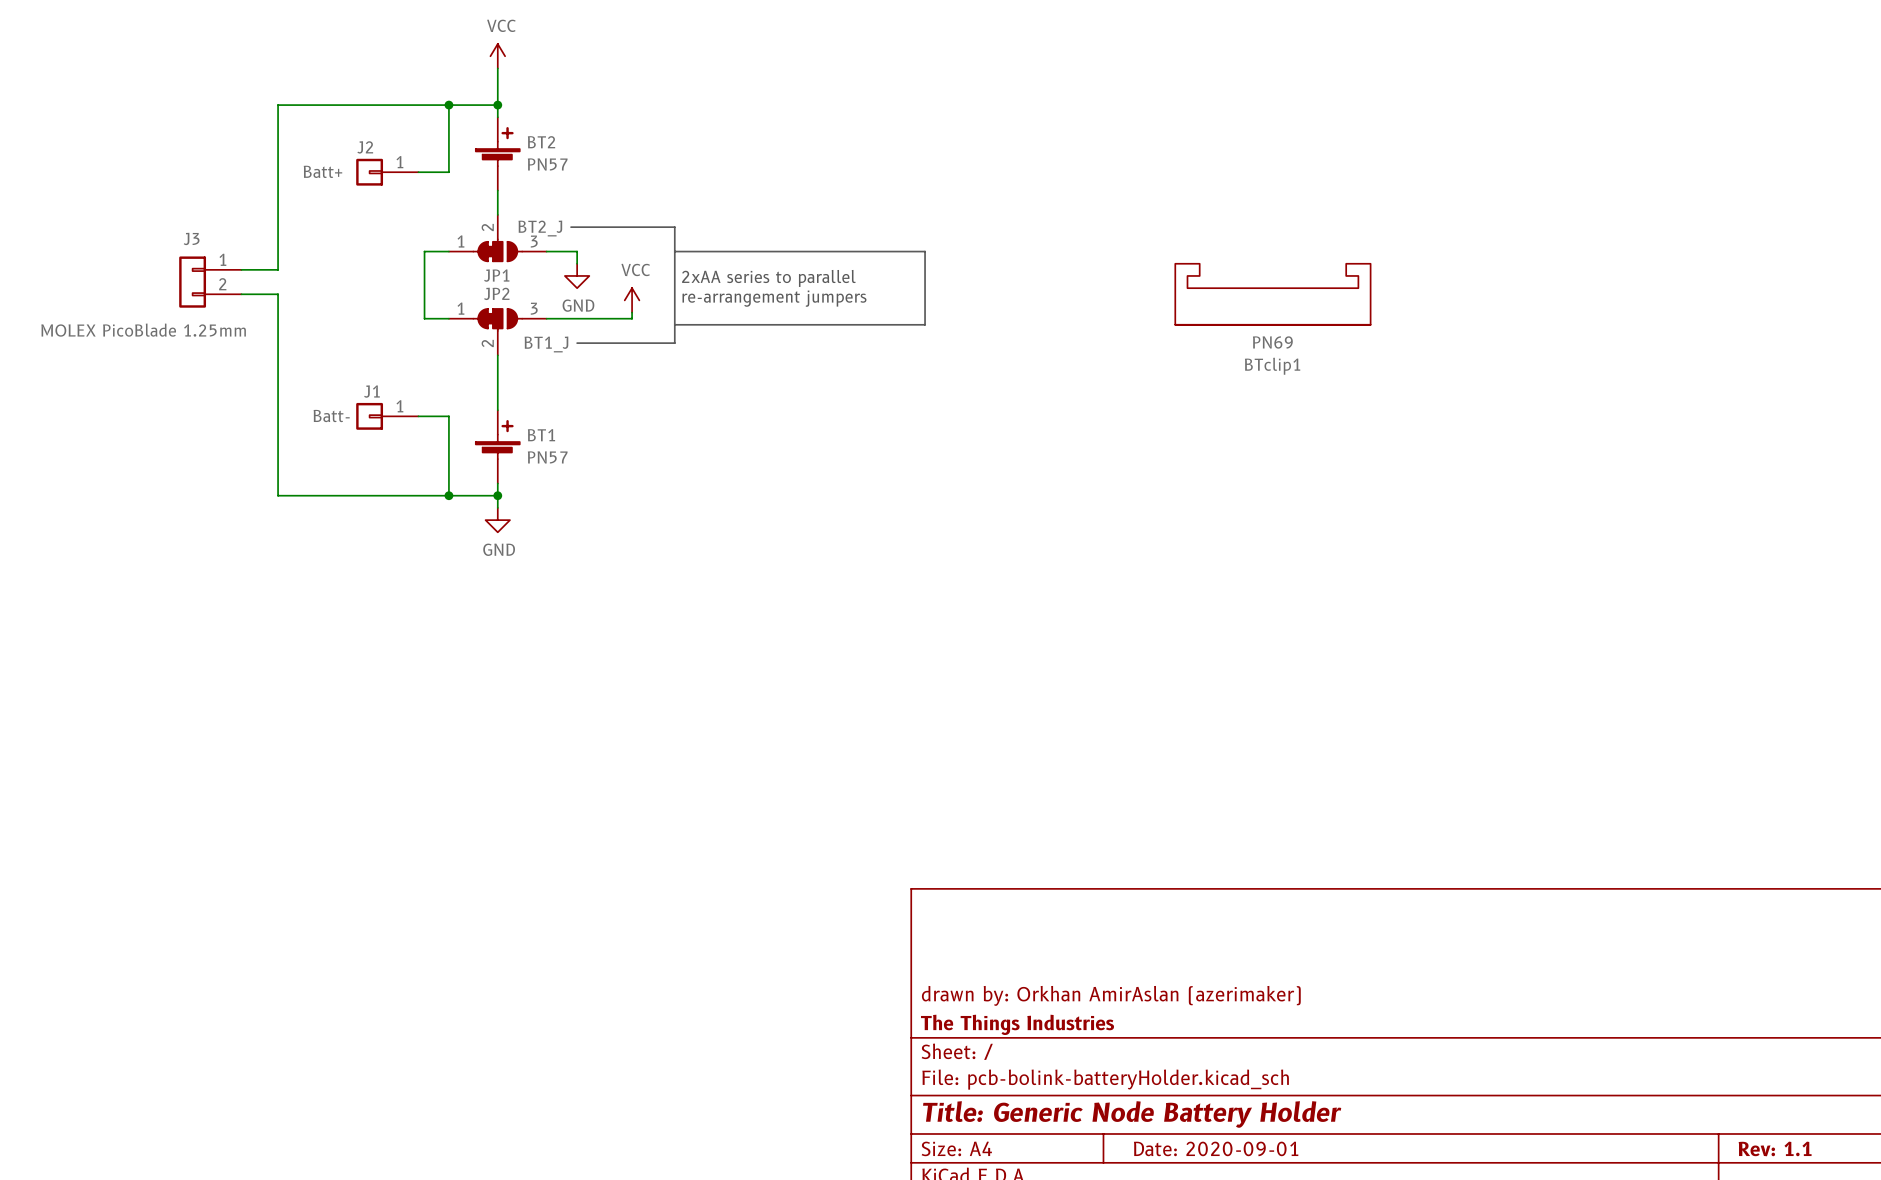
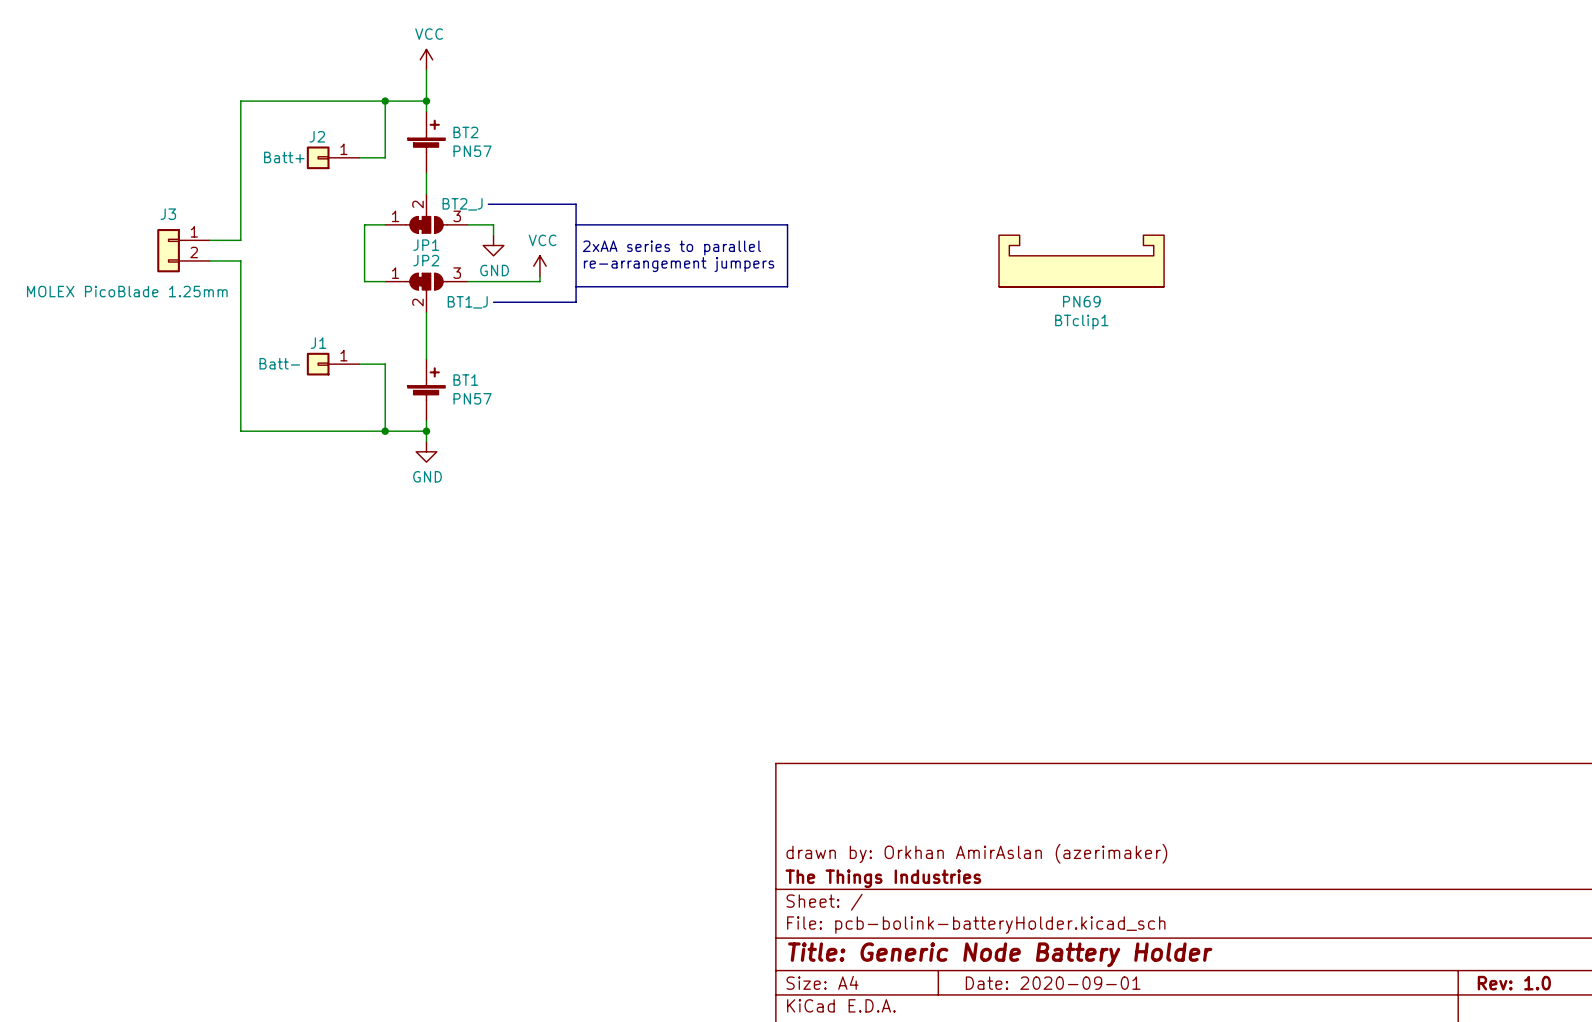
title block: Rev: 1.1 (1775, 1148) -> Rev: 1.0 (1514, 983)

